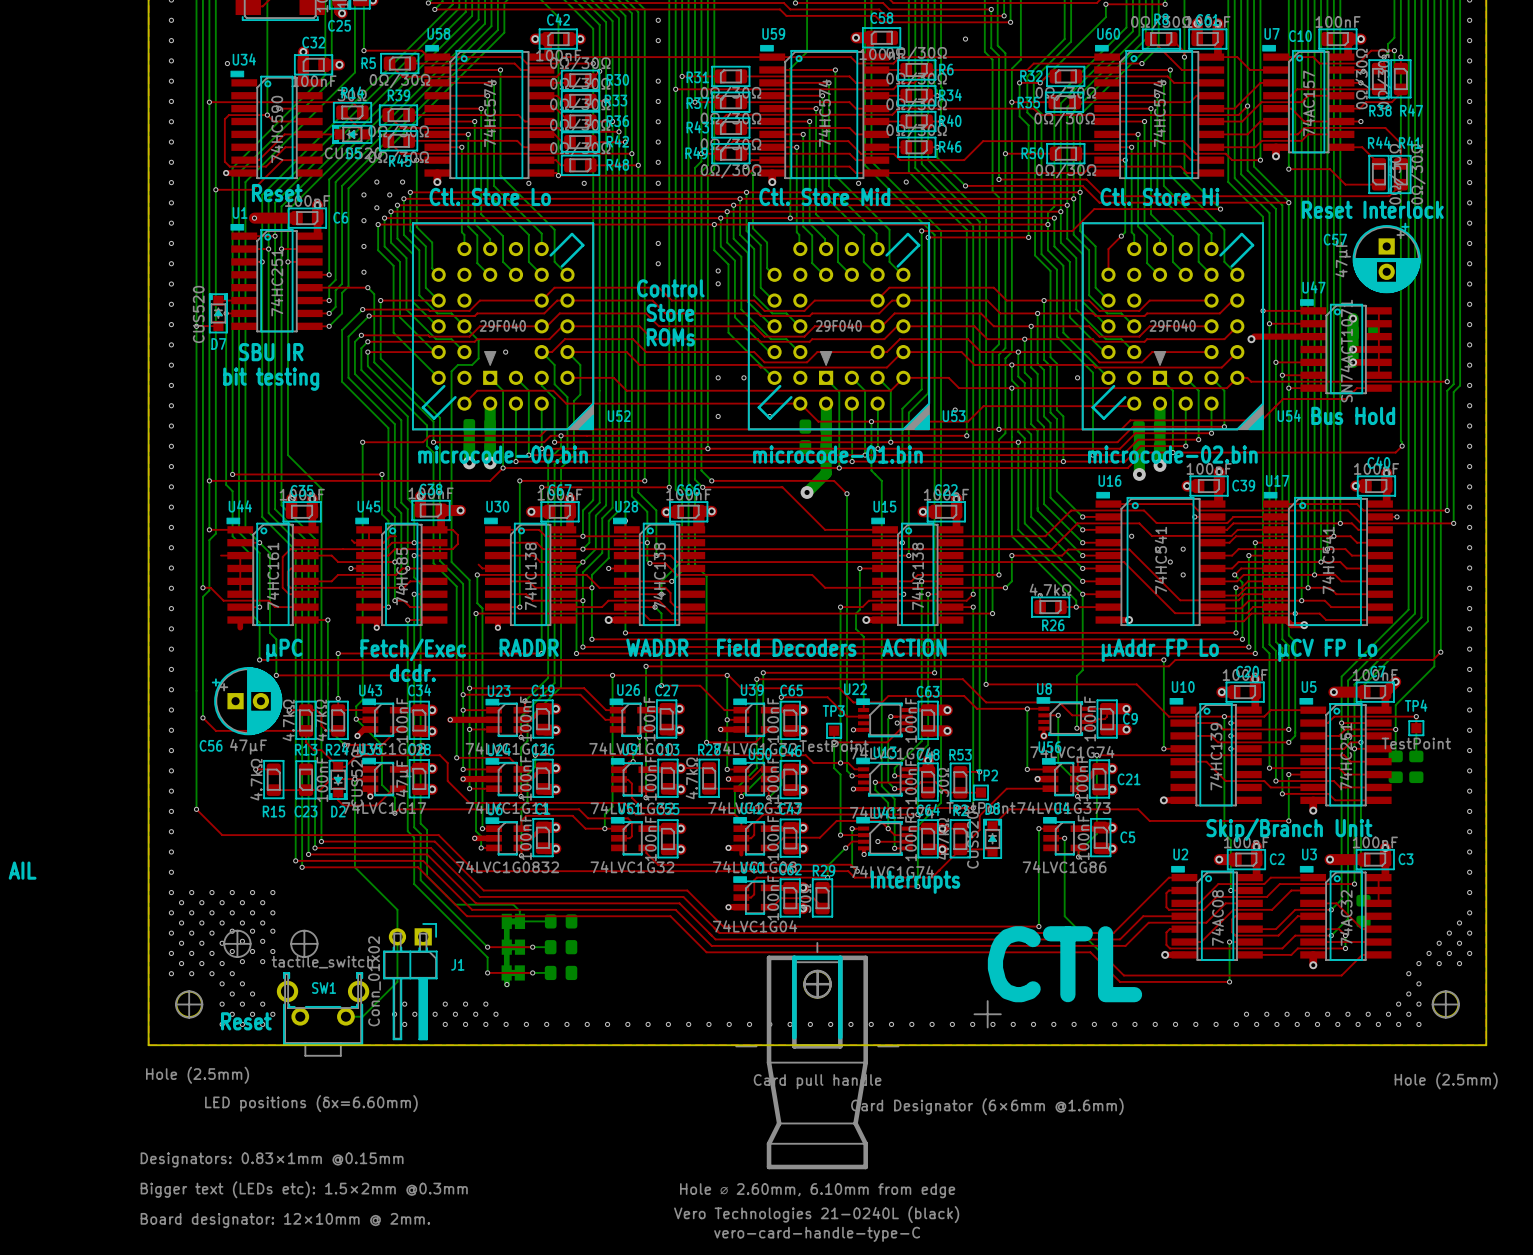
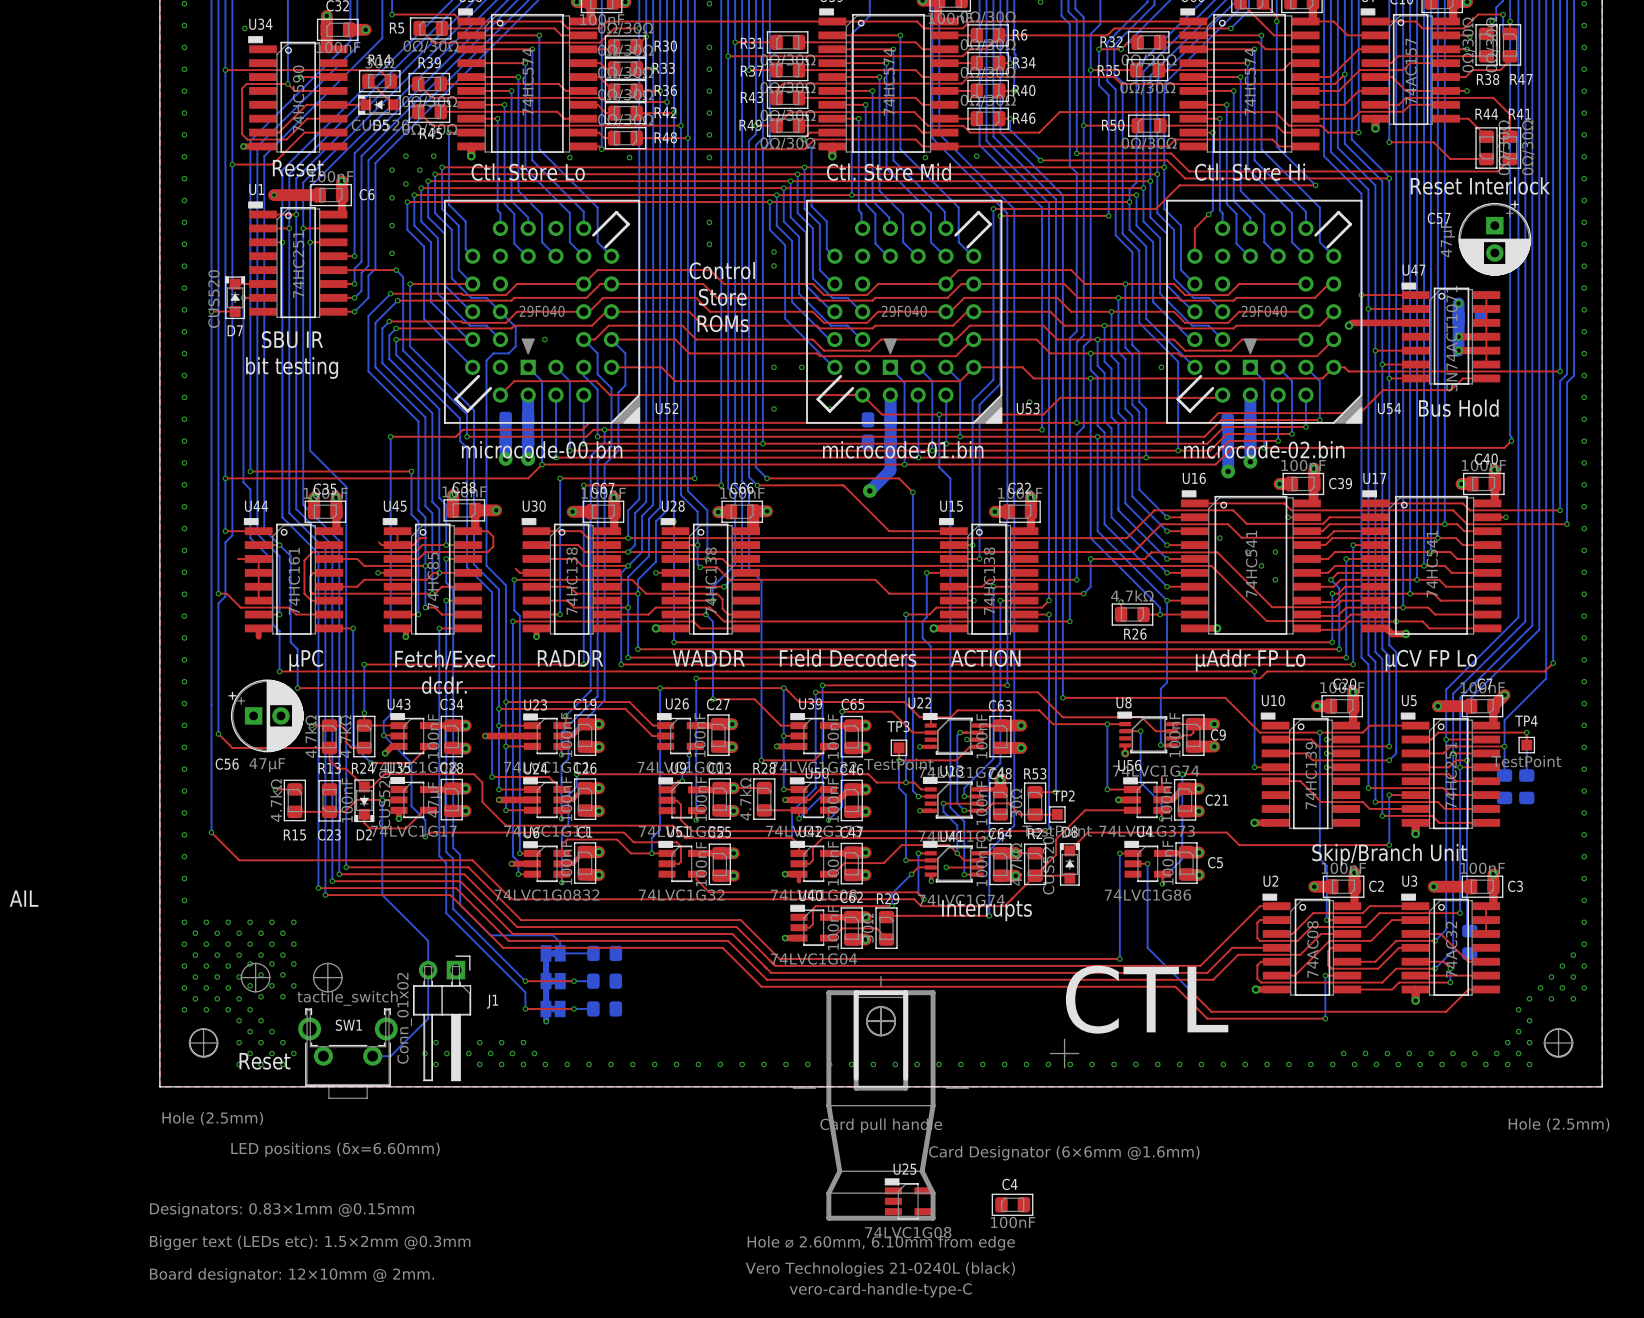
U25: none -> 74LVC1G08 (908, 1198)
C4: none -> 100nF (1012, 1204)

